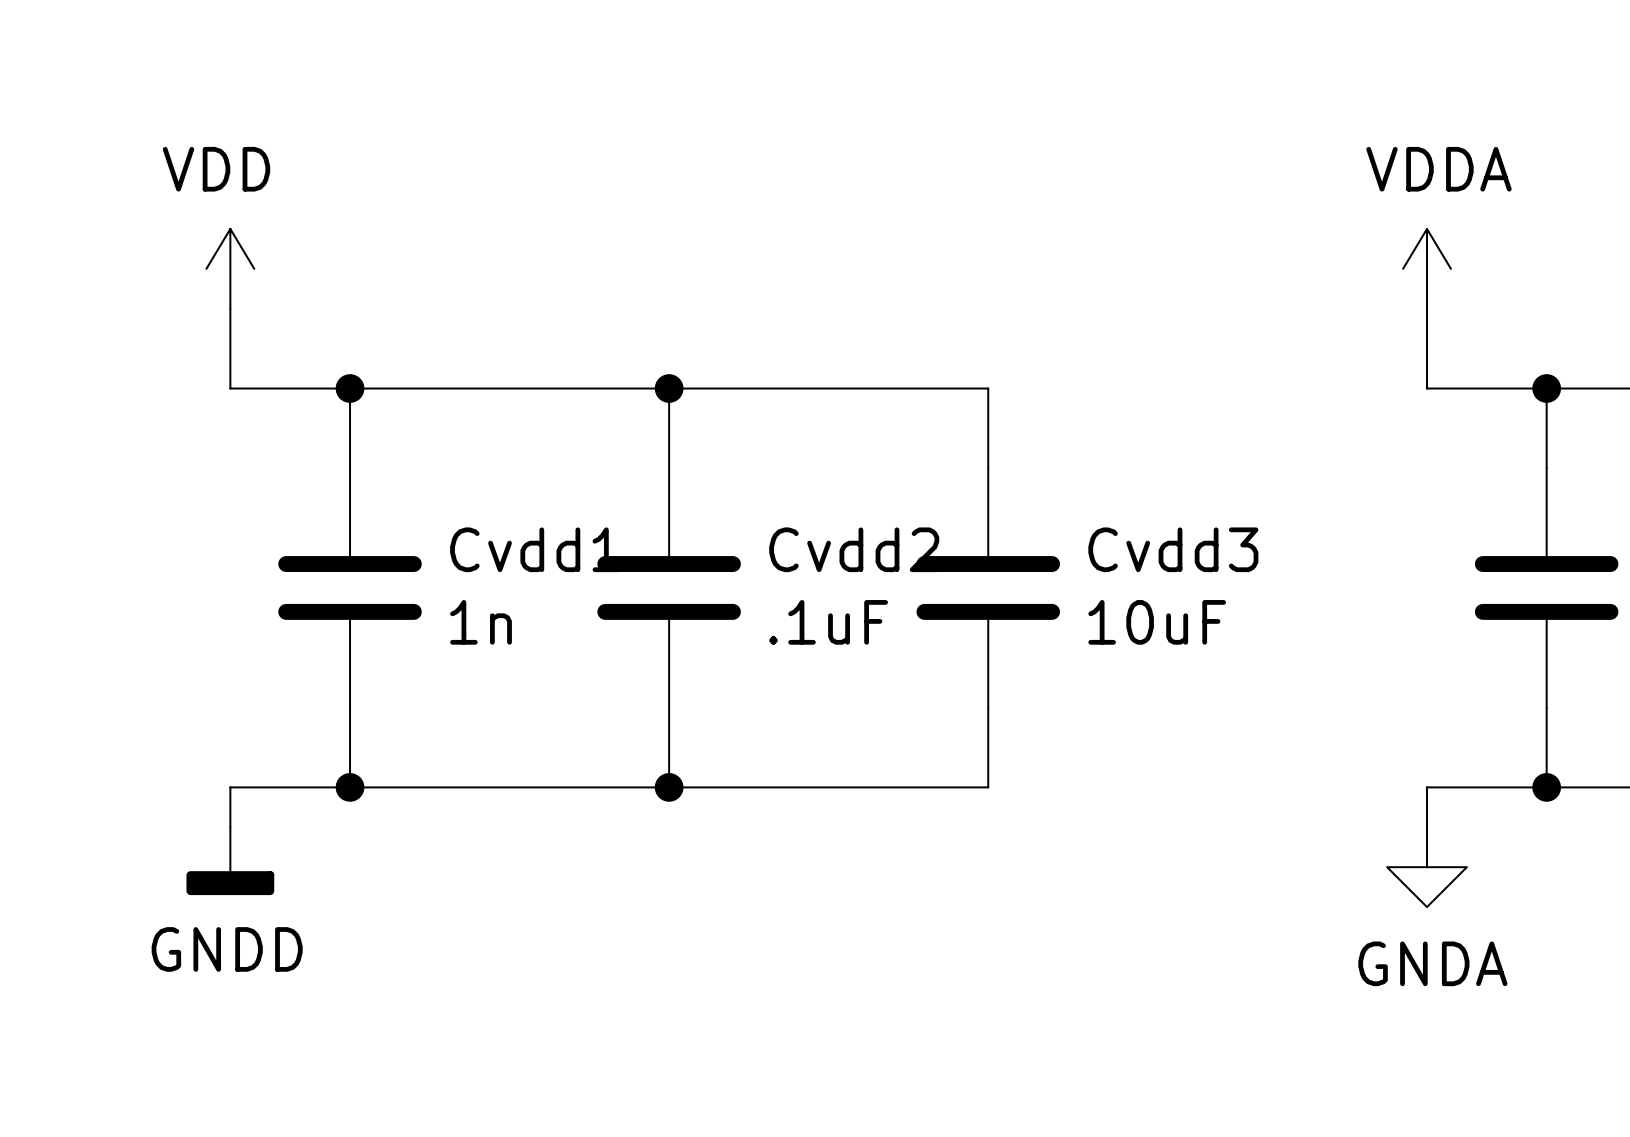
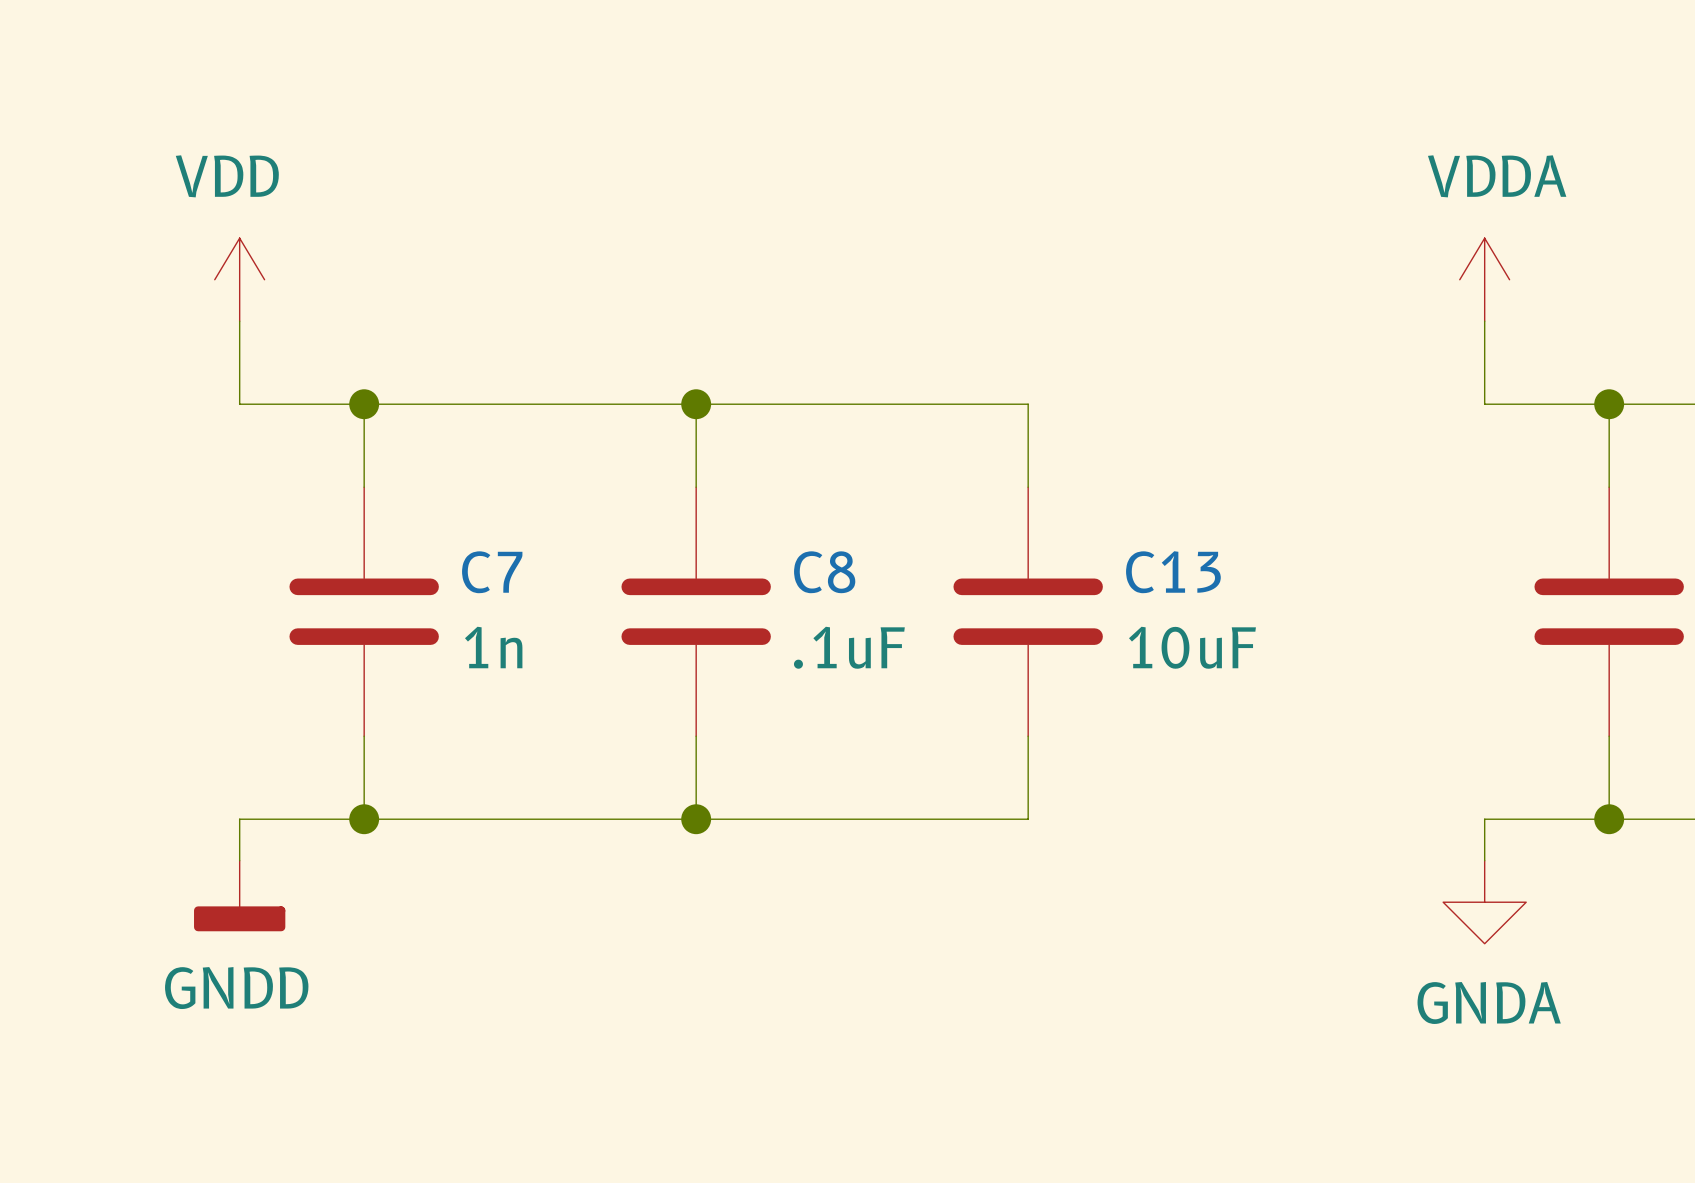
Cvdd1 name: Cvdd1 (535, 549) -> C7 (492, 572)
Cvdd2 name: Cvdd2 (854, 549) -> C8 (824, 572)
Cvdd3 name: Cvdd3 (1173, 549) -> C13 (1173, 572)

